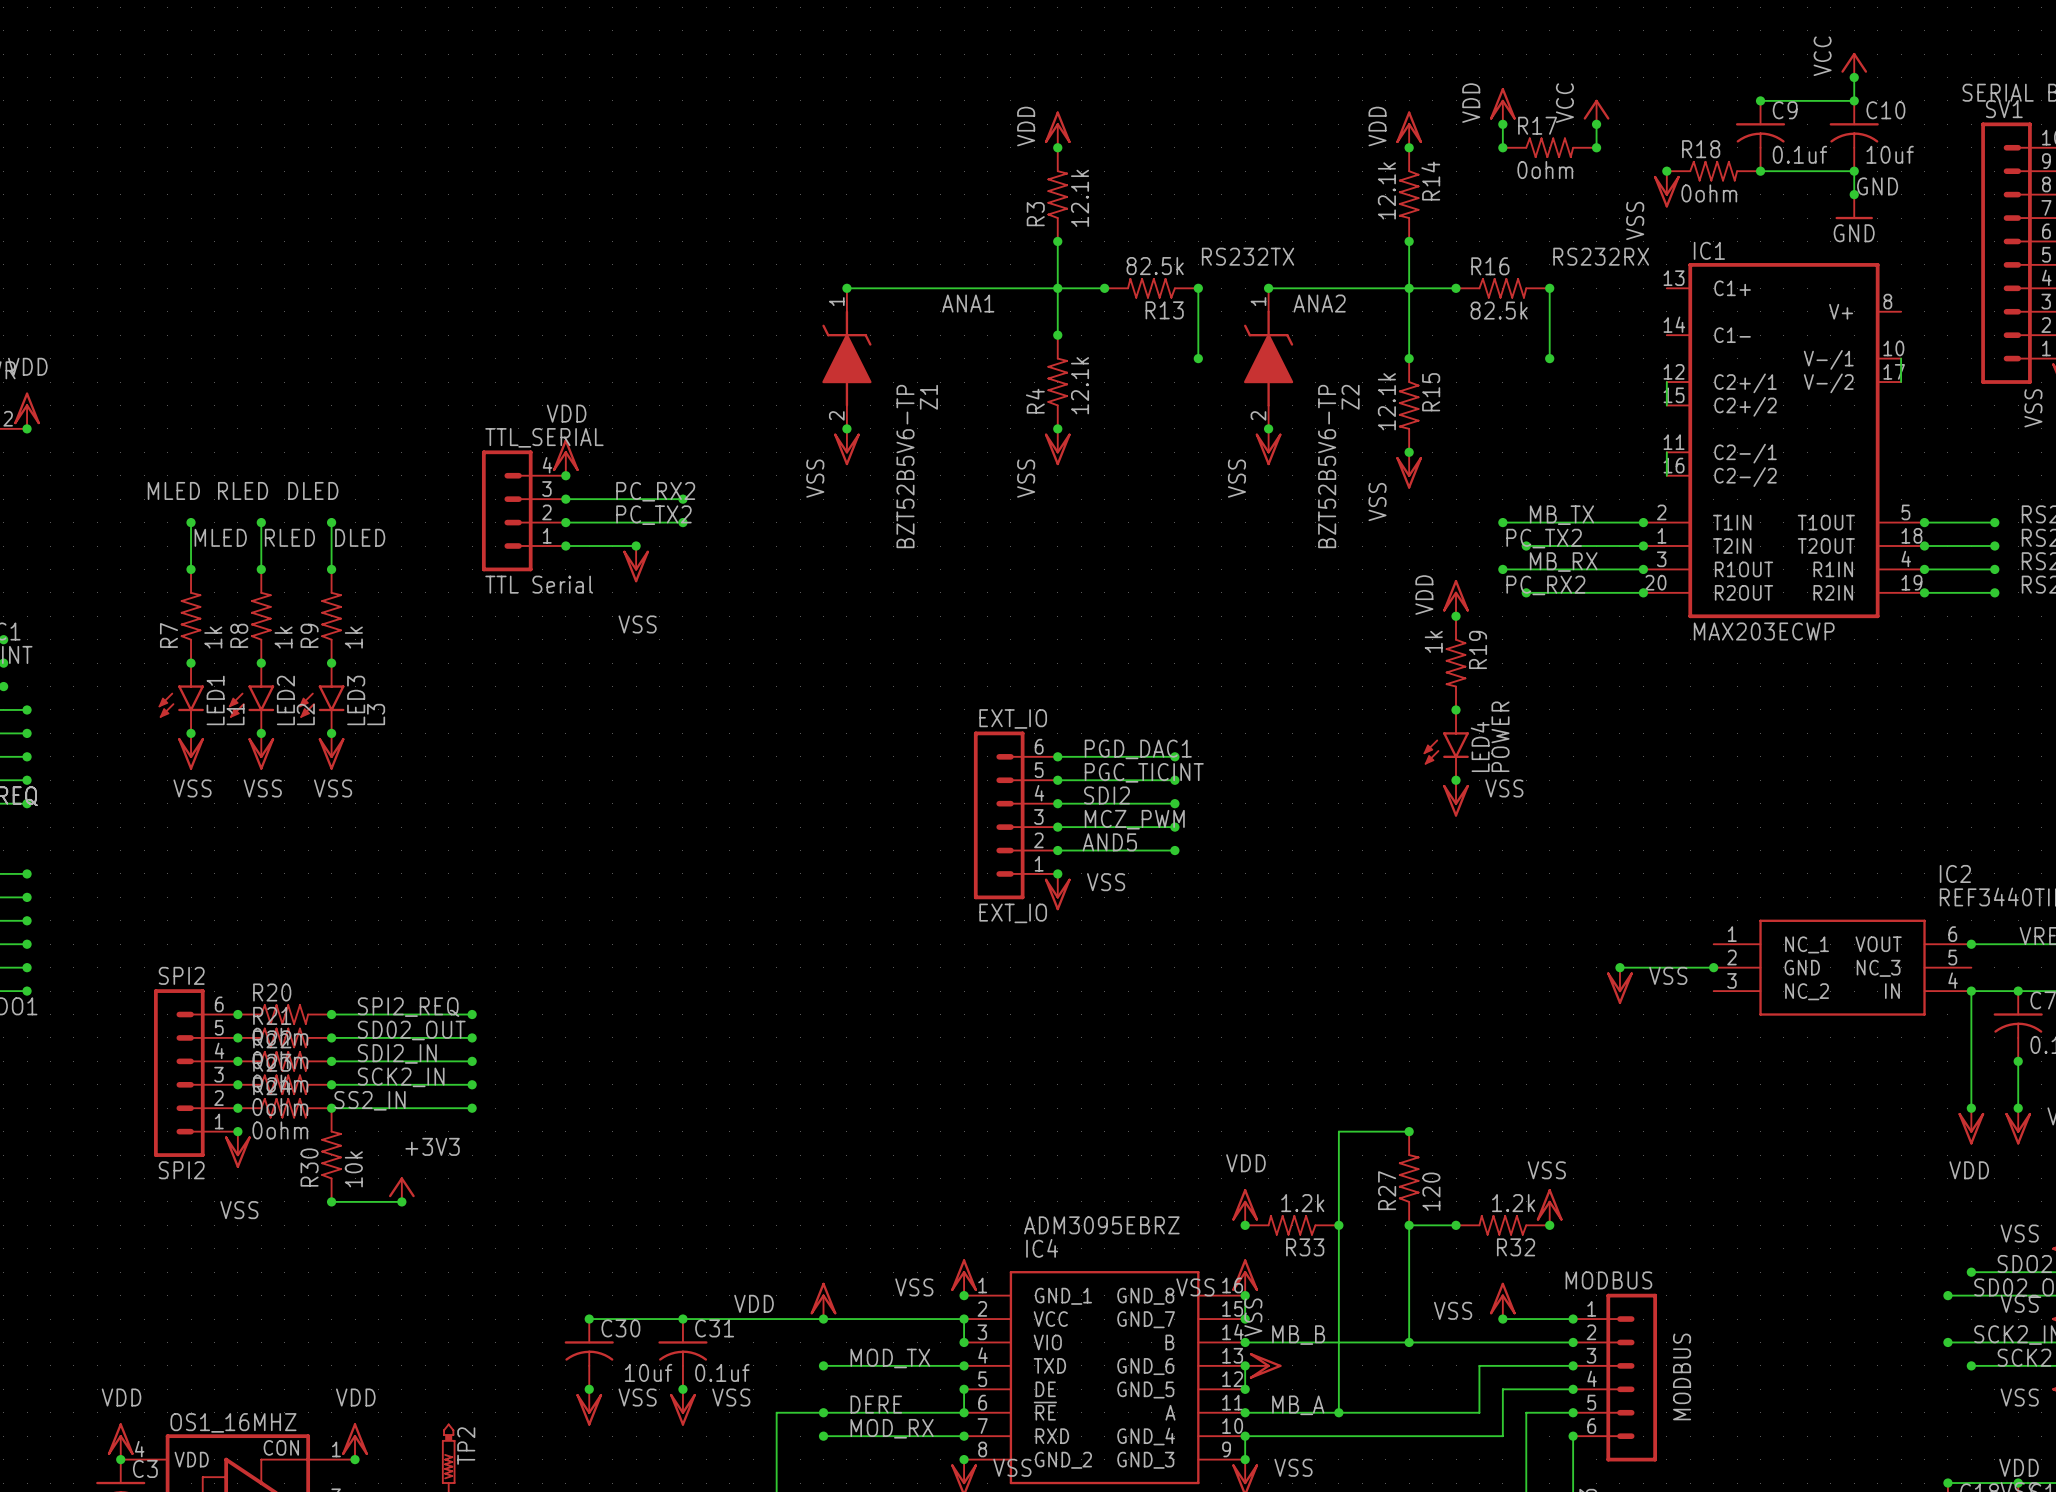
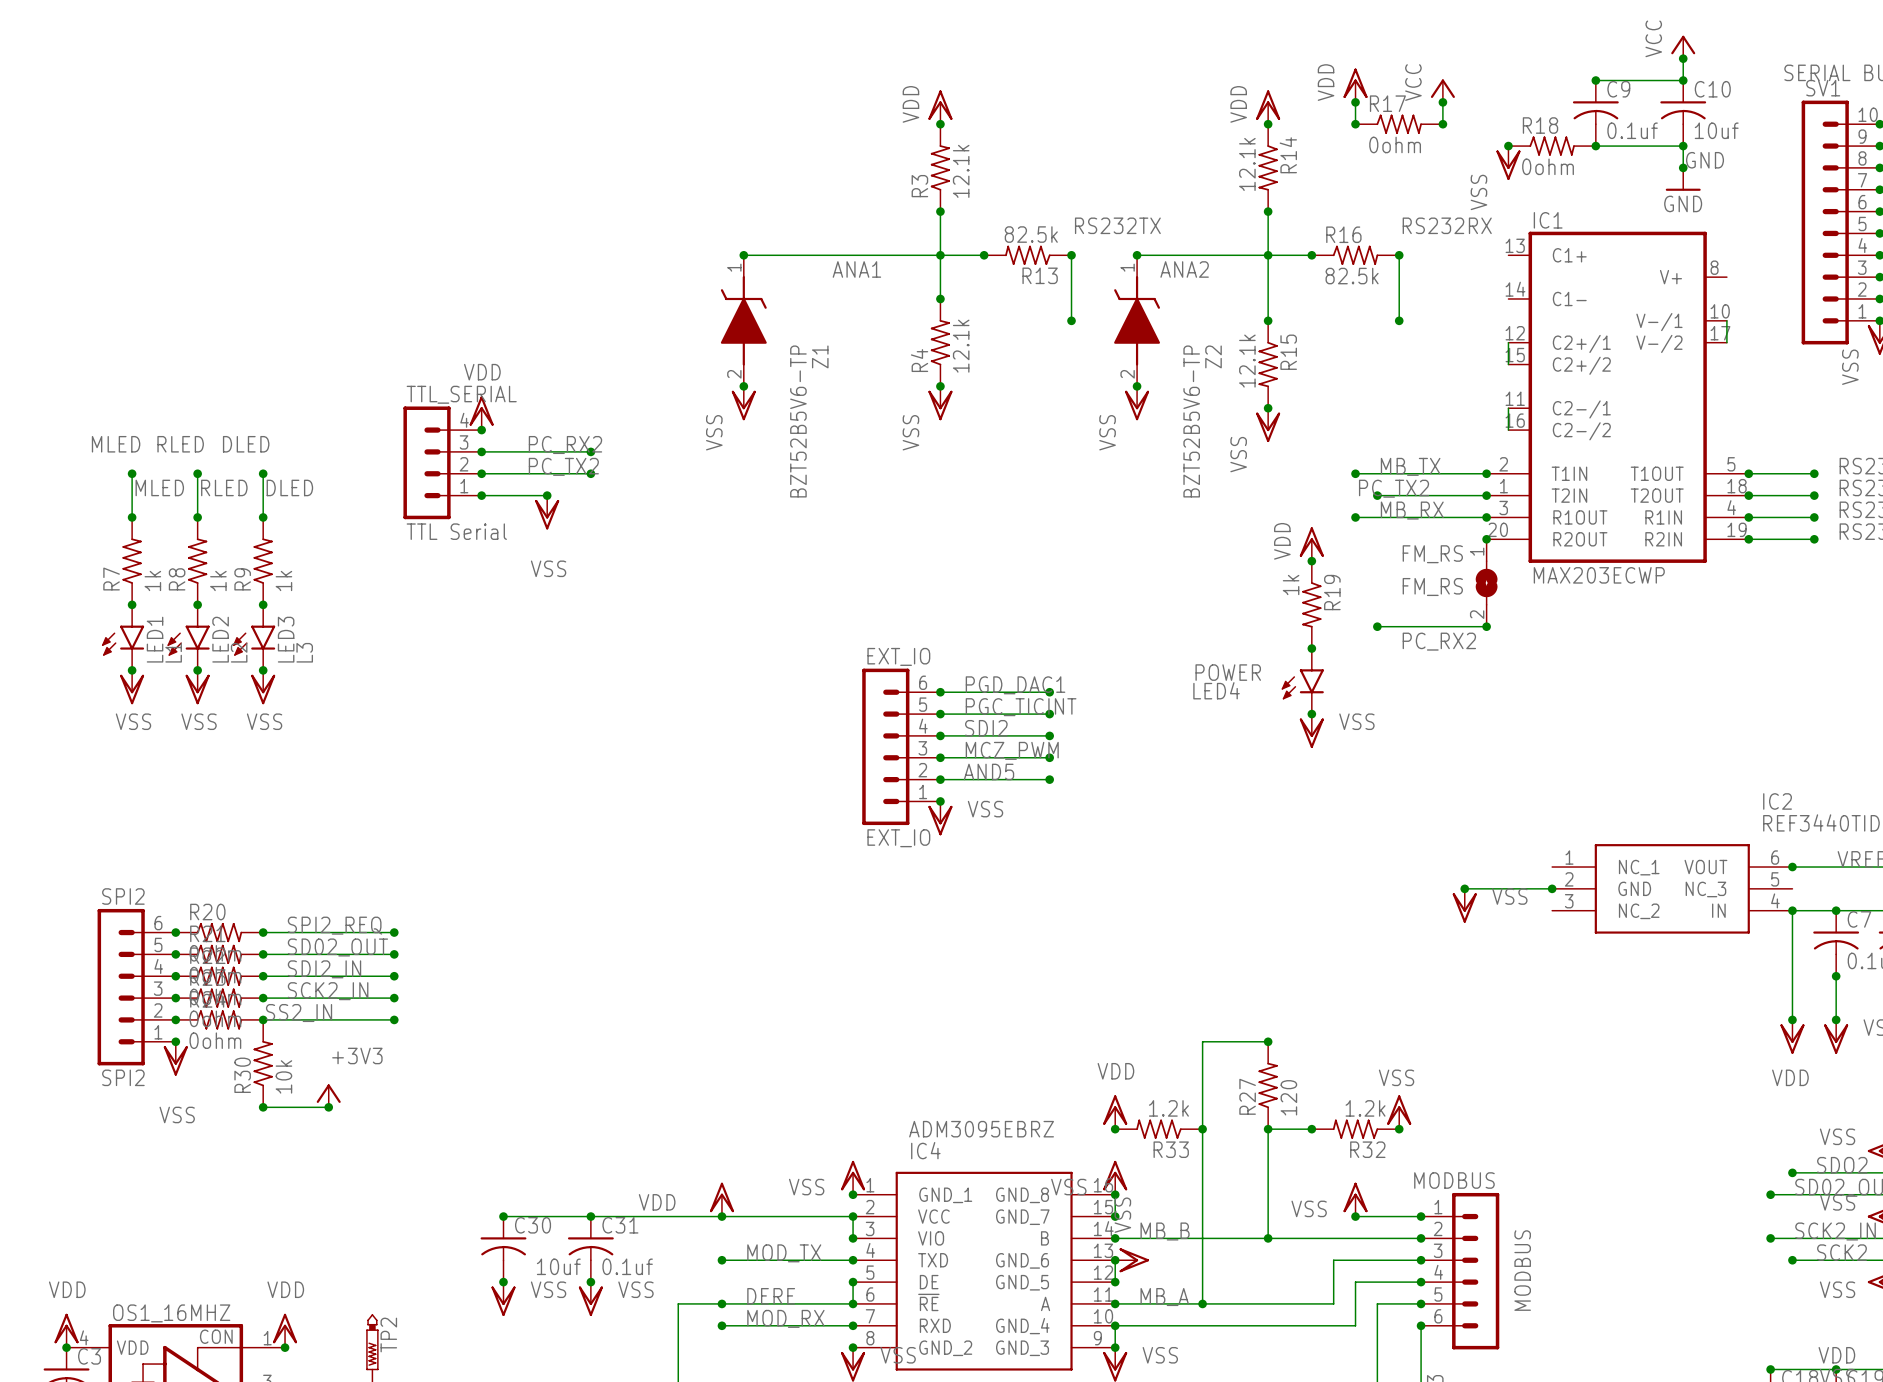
label position: PC_RX2 (1545, 585) -> PC_RX2 (1439, 641)
wire: (1526, 592) (1643, 592) -> (1377, 626) (1486, 626)
junction: (1526, 592) -> none
FM_RS: none -> FM_RS (1486, 583)
junction: none -> (1377, 626)
junction: none -> (1486, 626)
LED4 value rotation: 0° (1500, 736) -> 90° clockwise (1228, 672)
LED4 value position: POWER (1500, 736) -> POWER (1228, 672)
LED4 name rotation: 0° (1480, 746) -> 90° clockwise (1216, 690)
LED4 name position: LED4 (1480, 746) -> LED4 (1216, 690)

